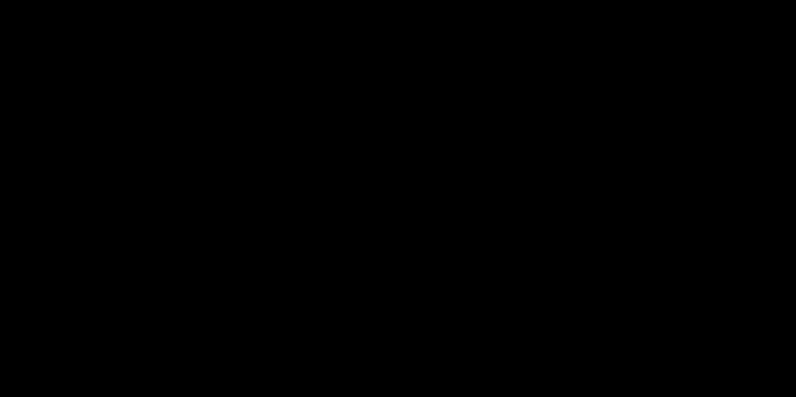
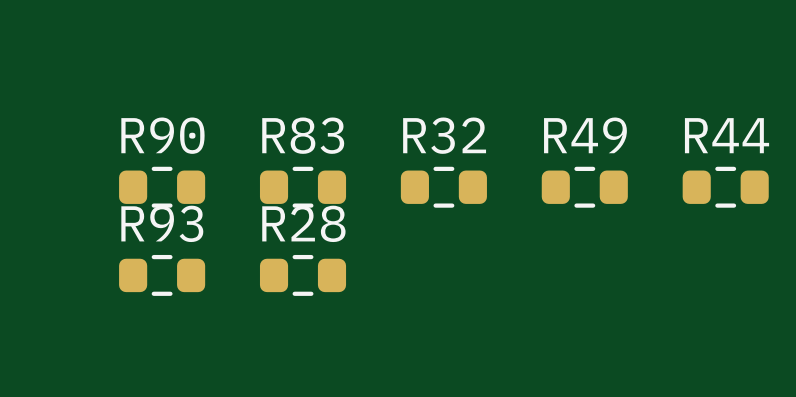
R90: none -> (162, 187)
R83: none -> (303, 187)
R32: none -> (443, 187)
R49: none -> (584, 187)
R44: none -> (725, 187)
R93: none -> (162, 275)
R28: none -> (303, 275)

